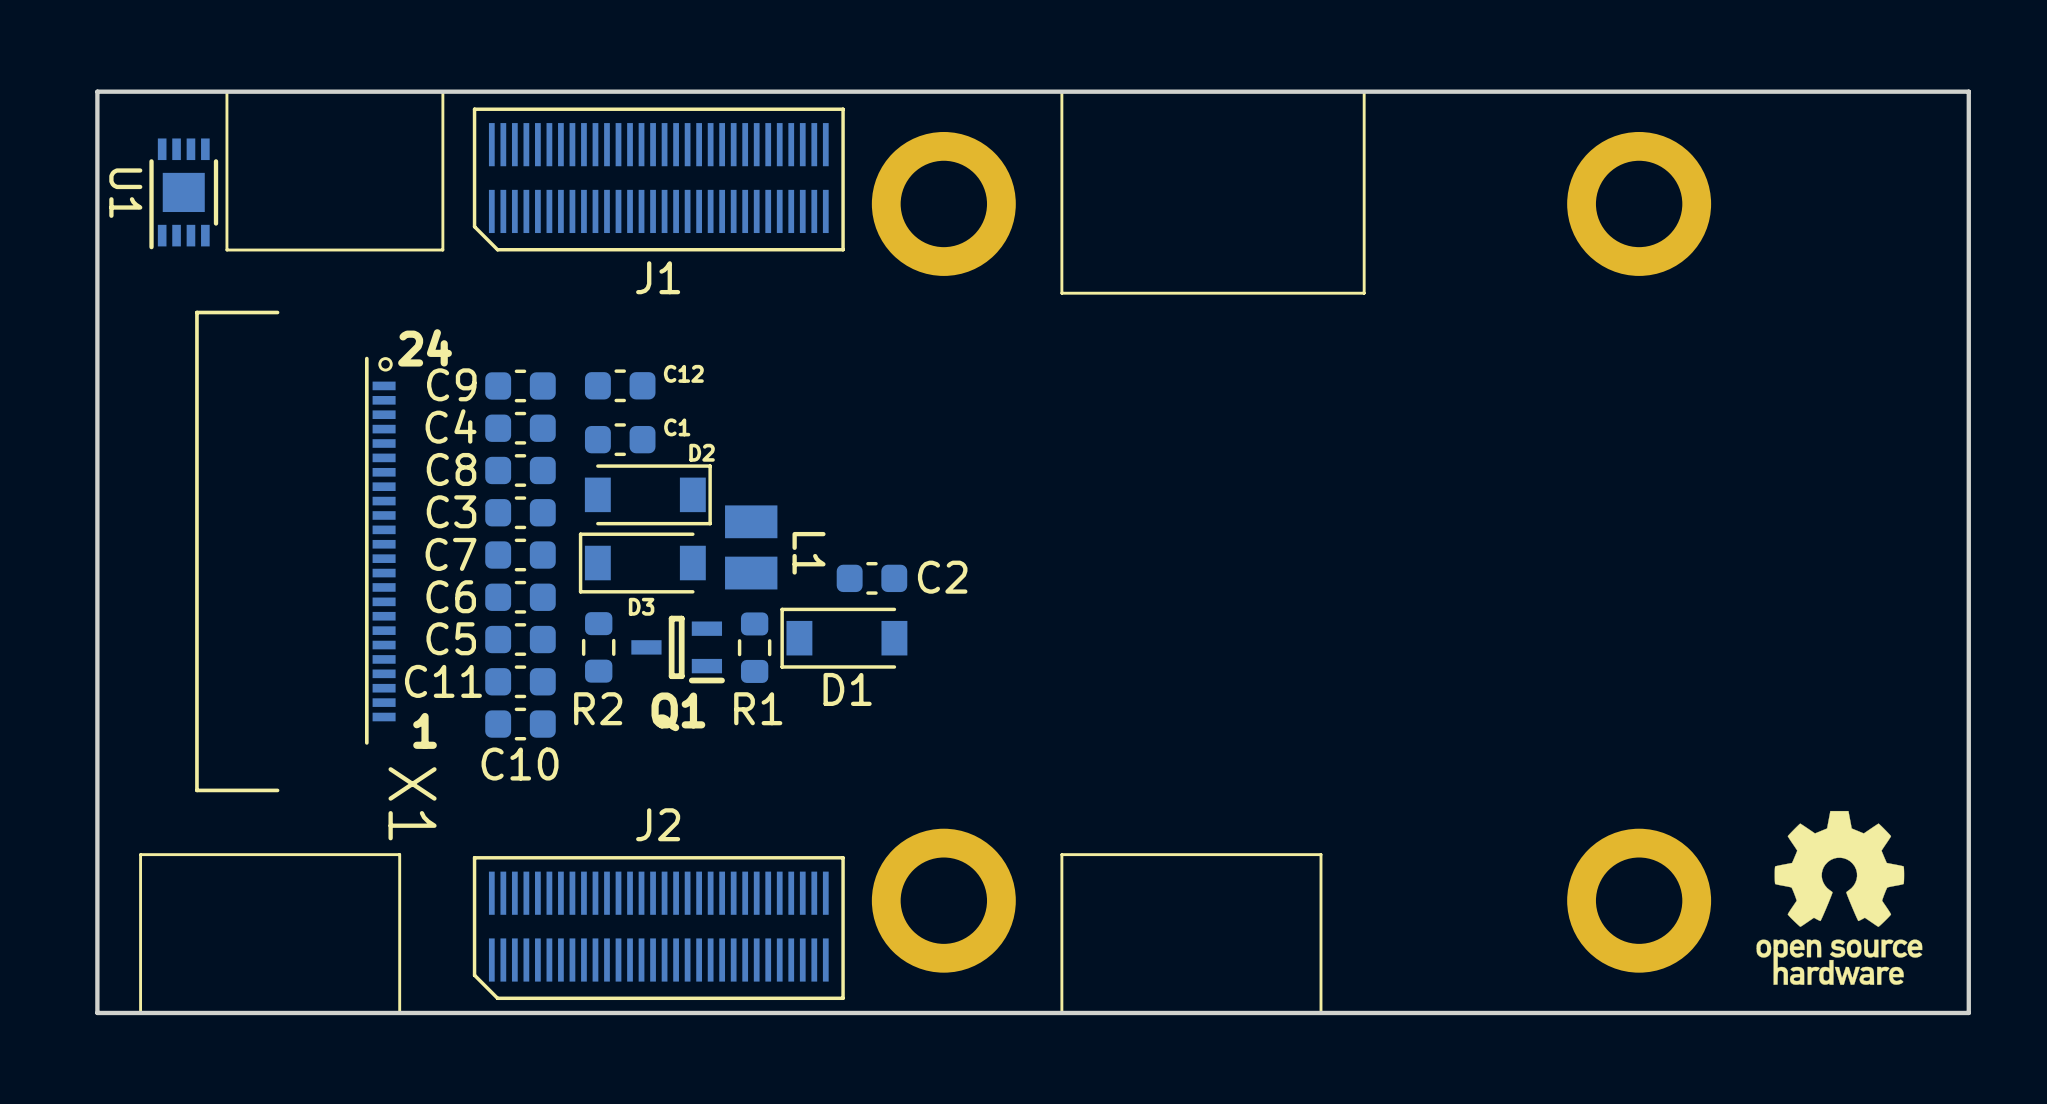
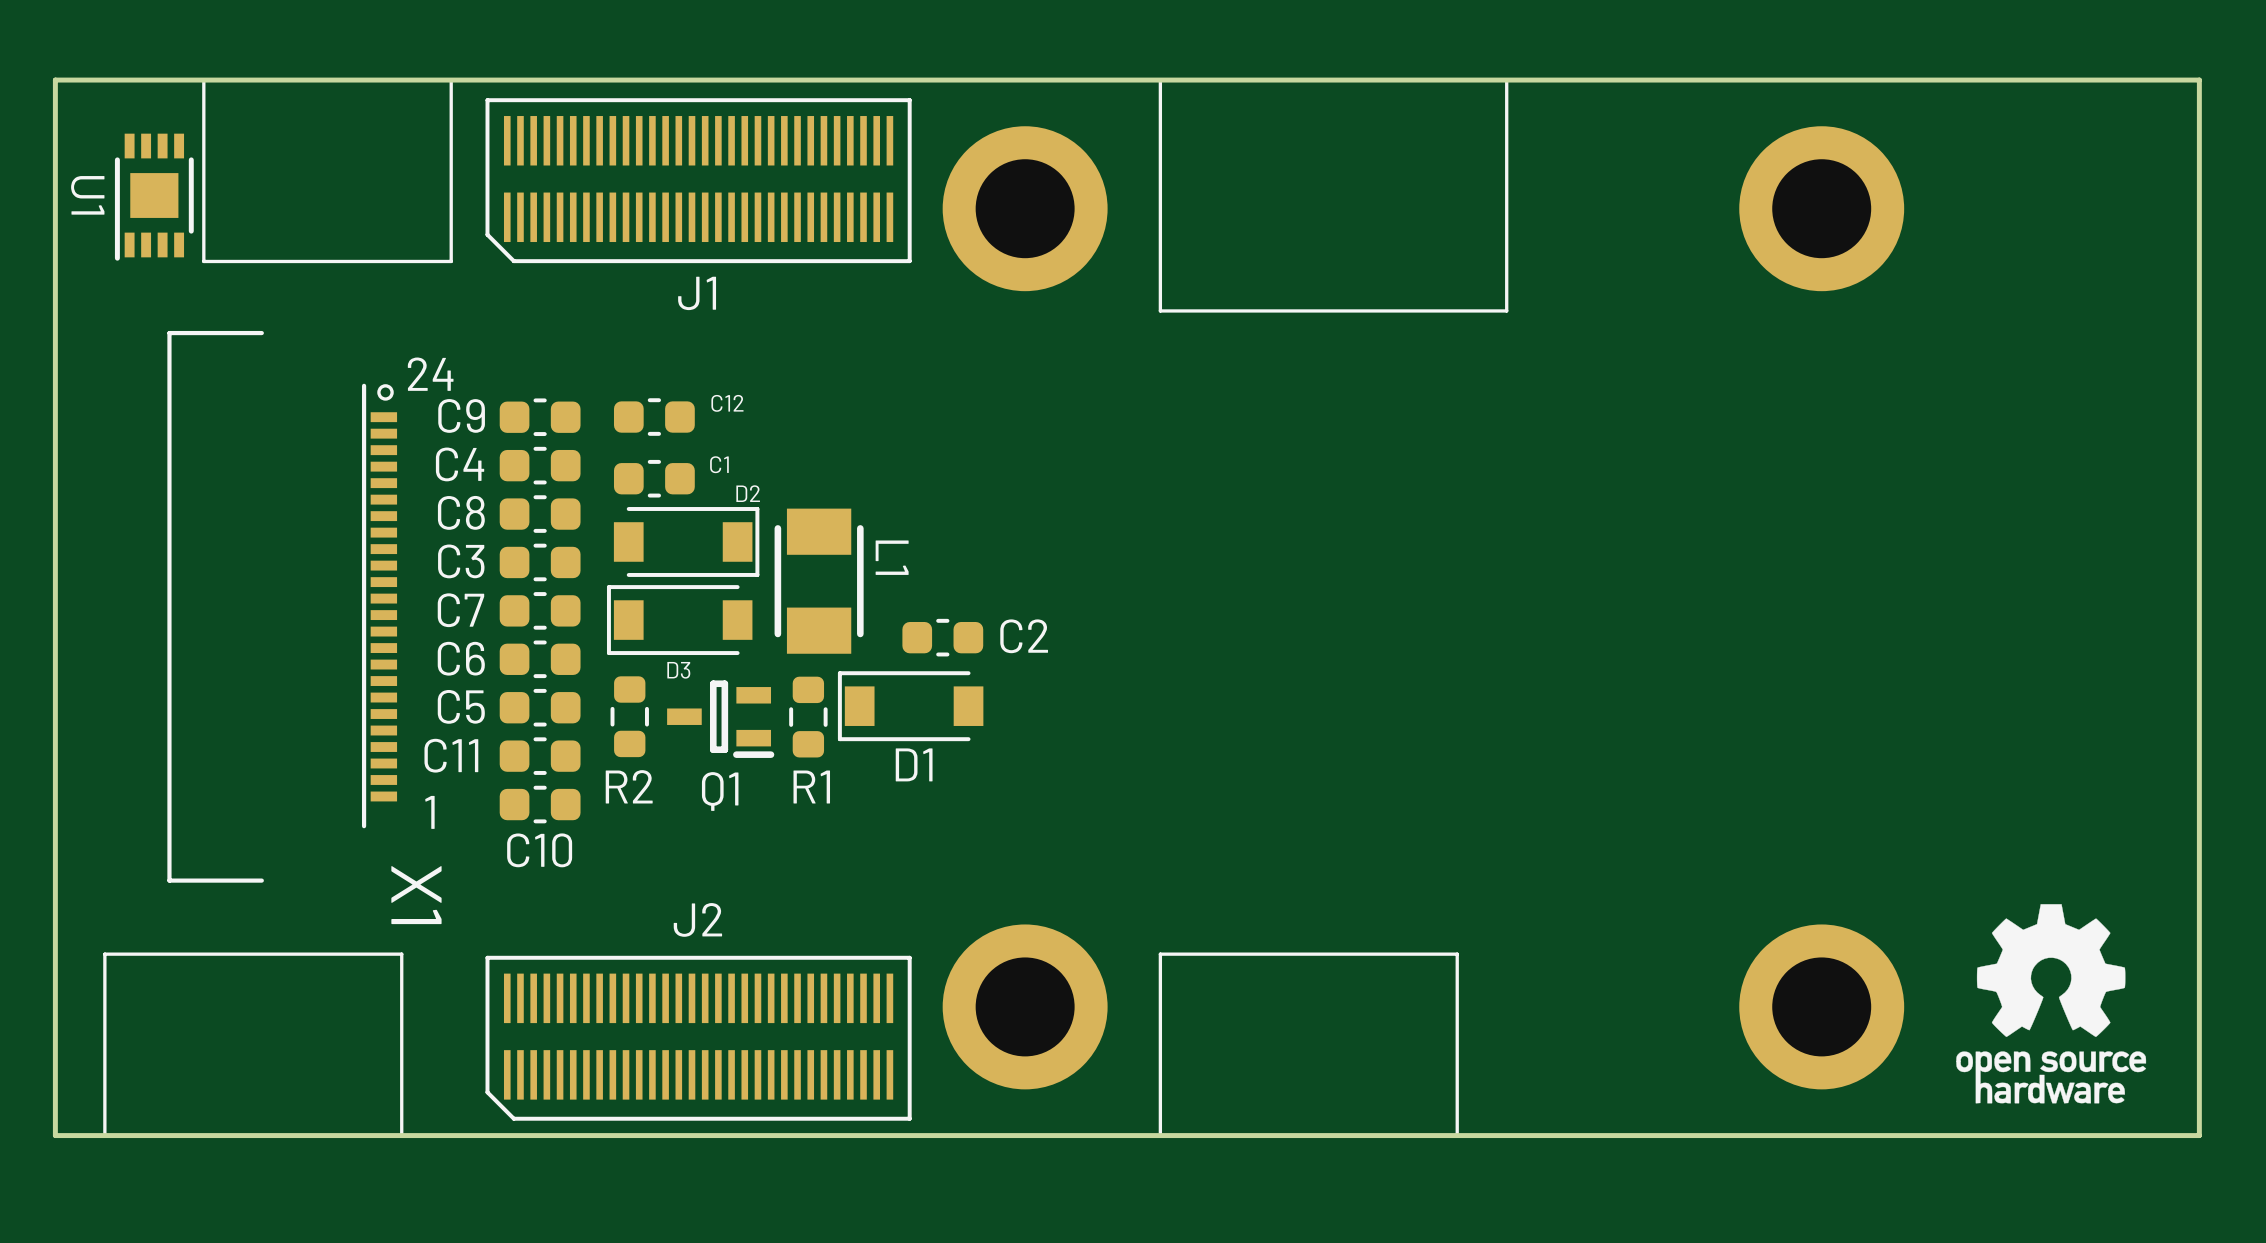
L1 footprint: [725, 505, 778, 590] -> [774, 508, 864, 654]

